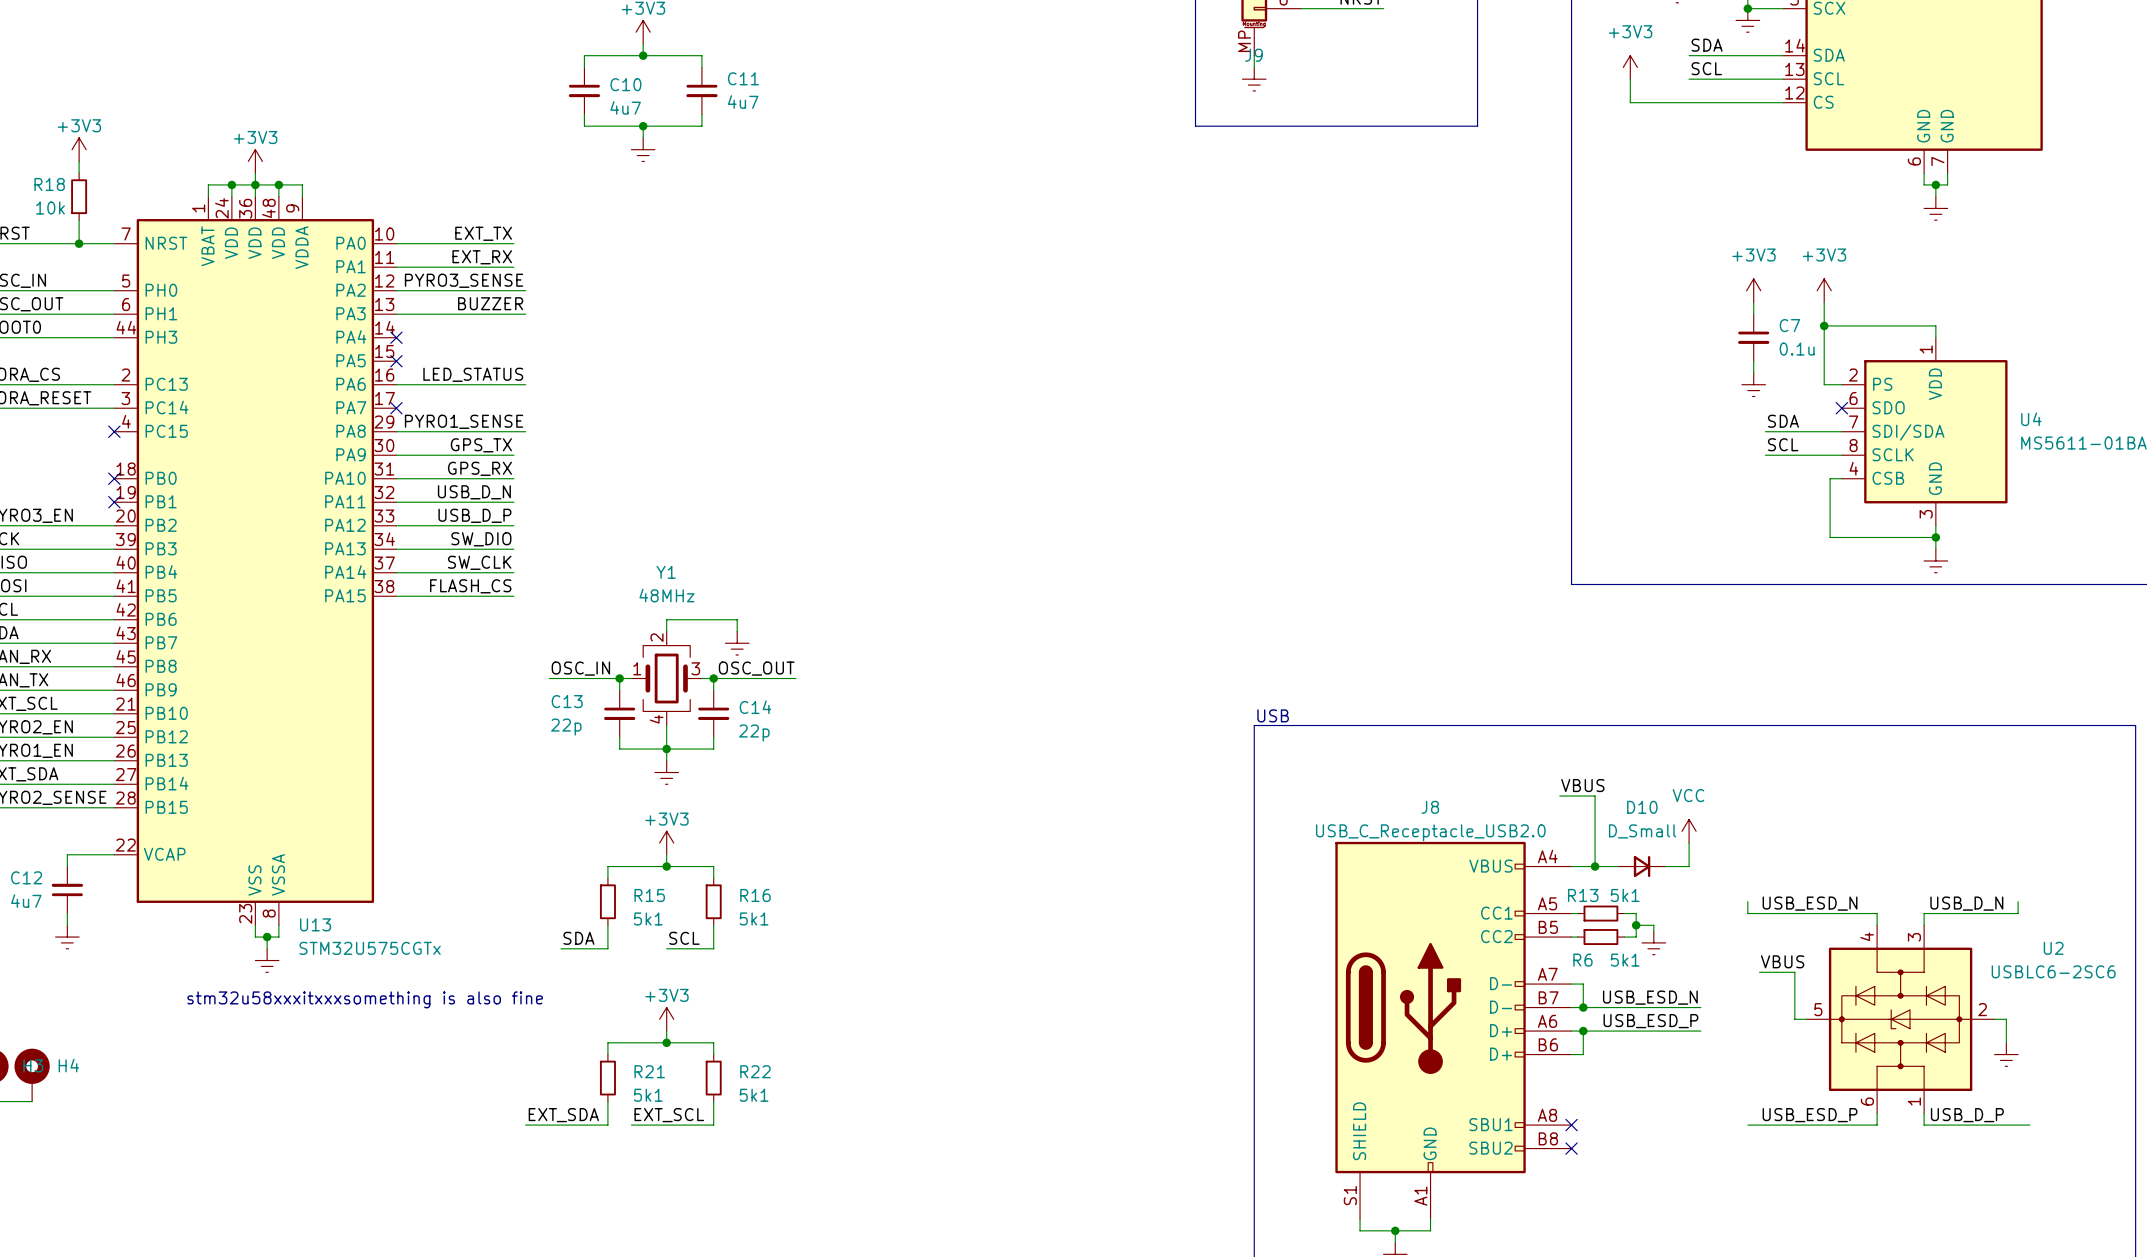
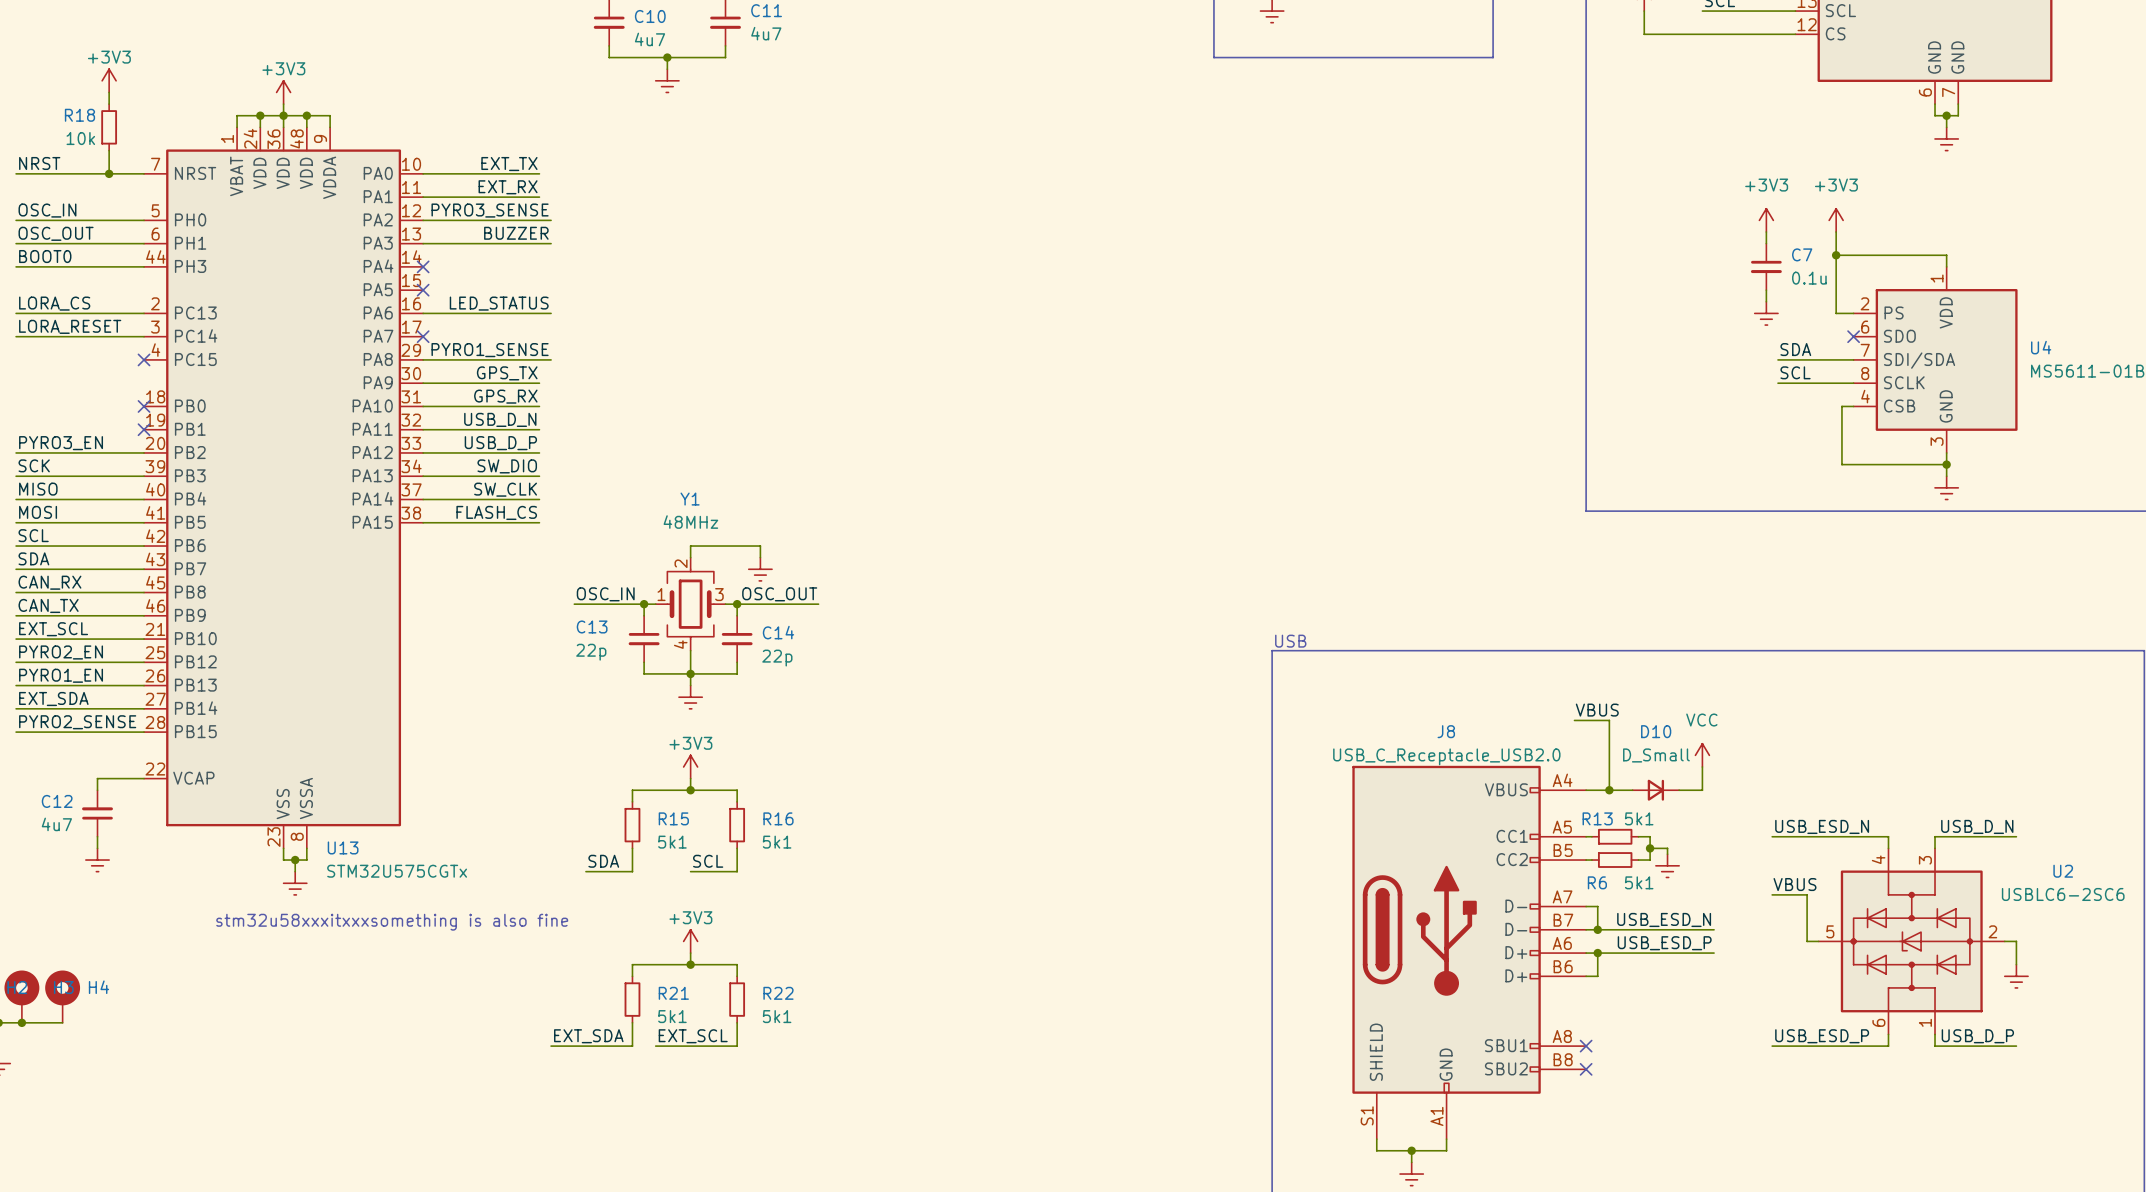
wire: (1747, 901) (1747, 913) (1759, 913) -> none
wire: (2018, 901) (2018, 913) (2006, 913) -> none
wire: (1747, 1125) (1759, 1125) -> none
wire: (2006, 1125) (2029, 1125) -> none

